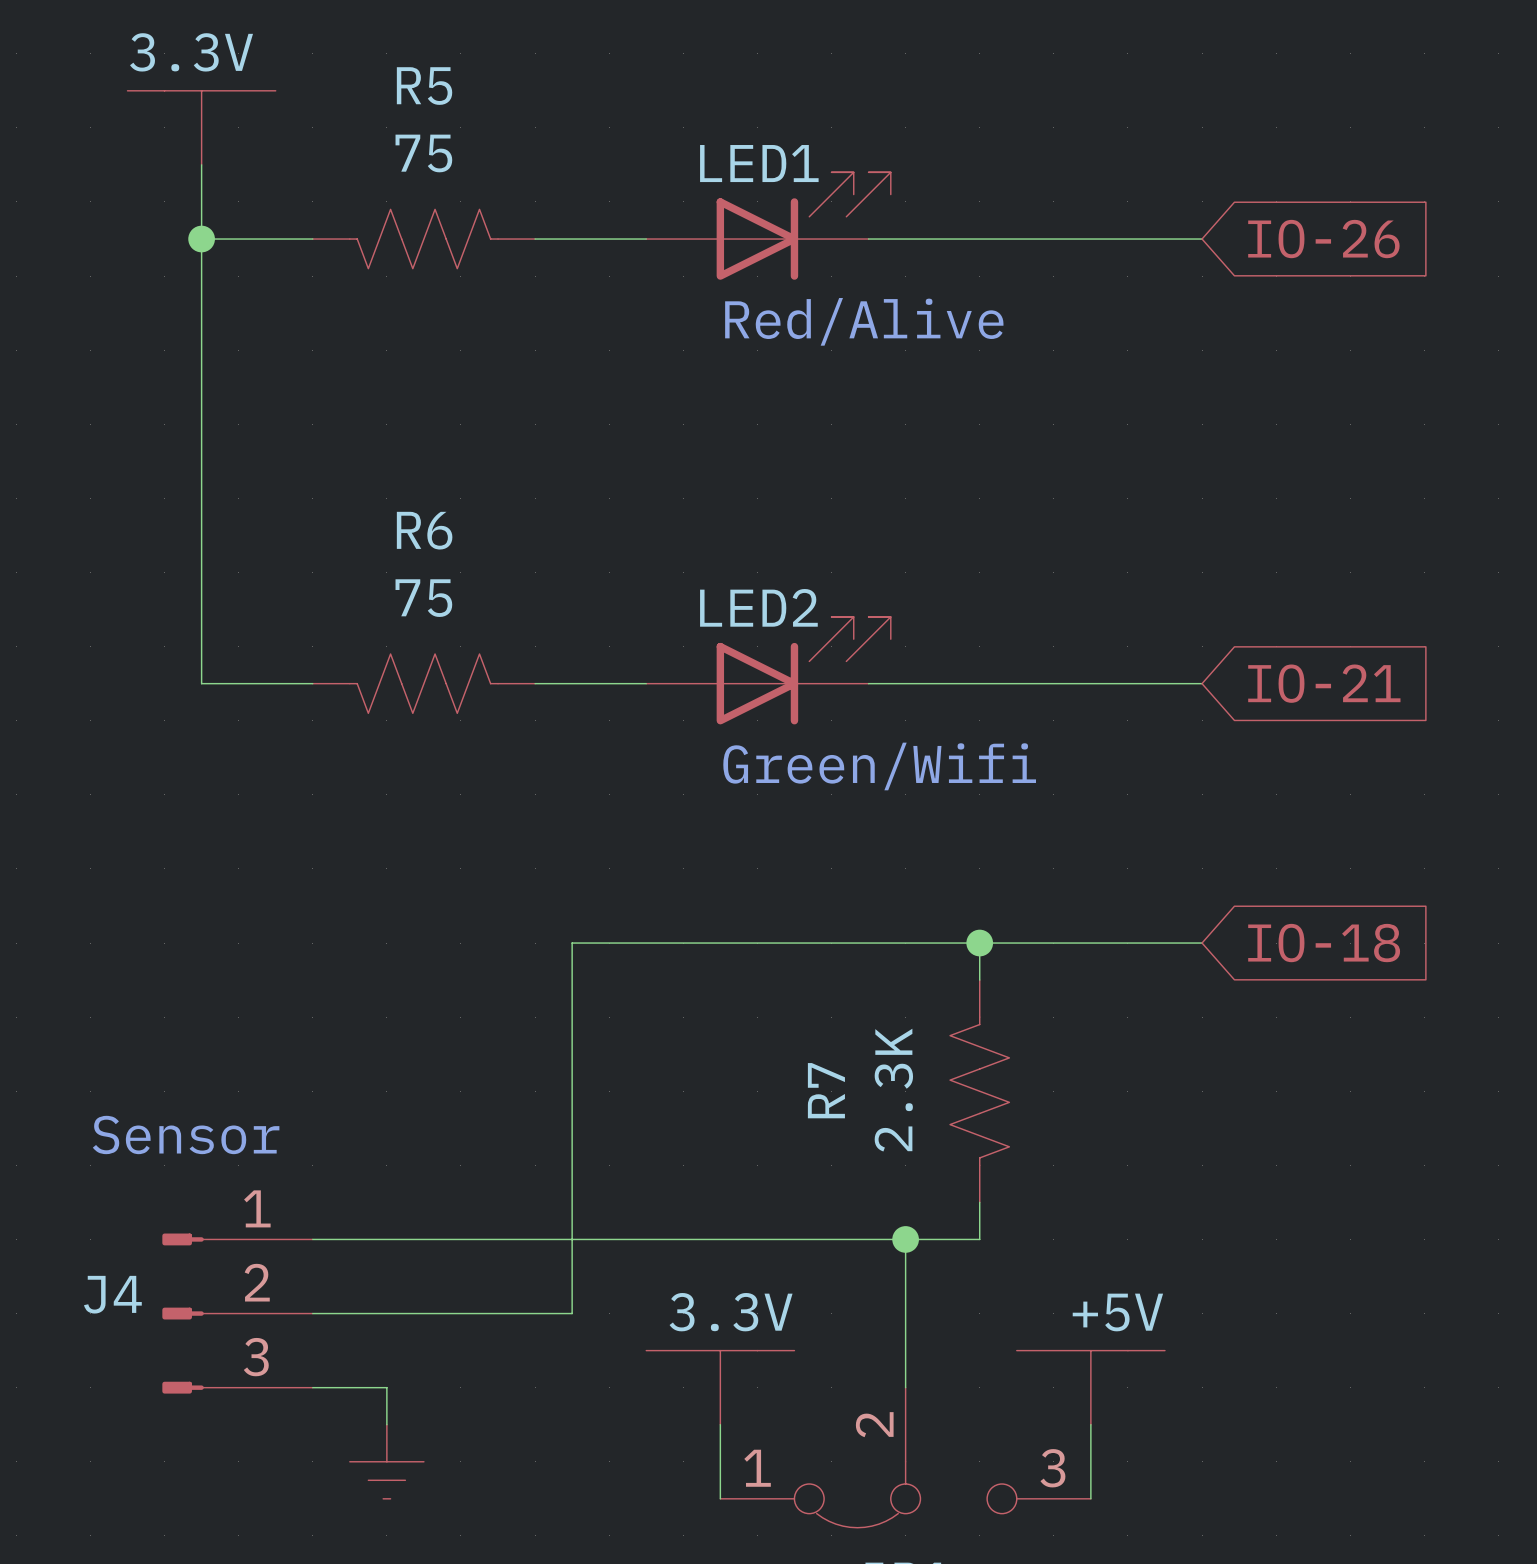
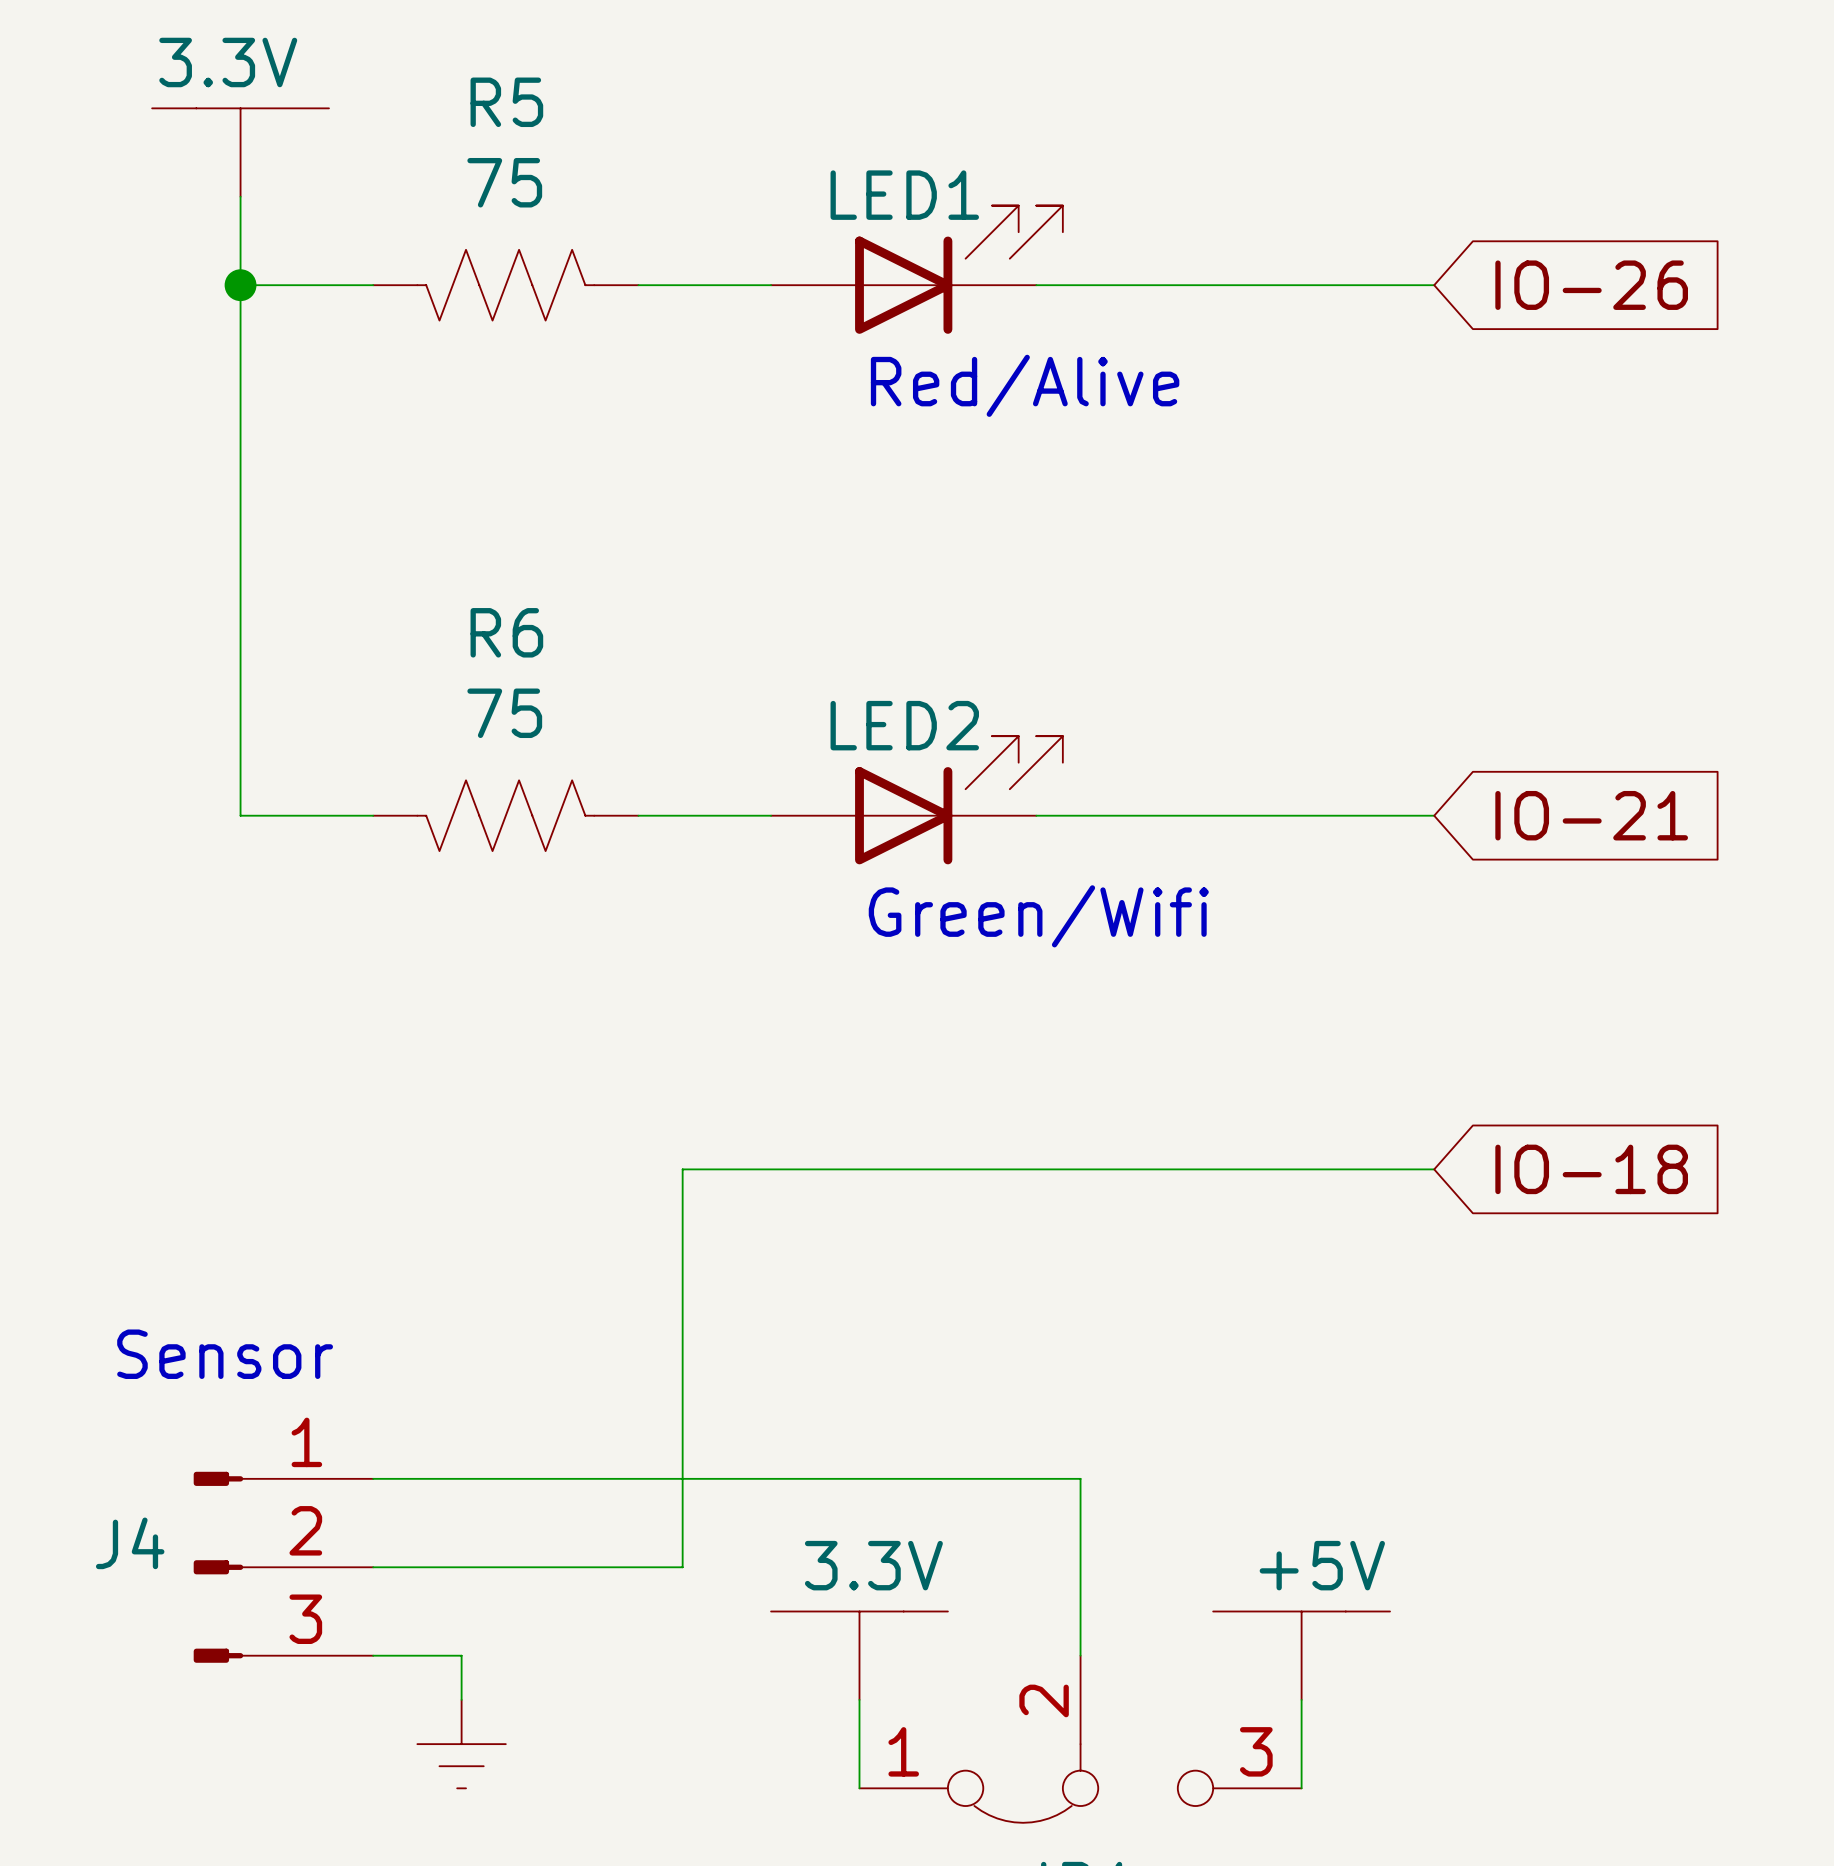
wire: (979, 943) (979, 980) -> none
junction: (979, 943) -> none
wire: (1202, 943) (572, 943) (572, 980) -> (1434, 1169) (682, 1169)
global label position: IO-18 (1324, 943) -> IO-18 (1591, 1169)
R7: 2.3K (979, 1091) -> none
wire: (979, 1202) (979, 1239) (905, 1239) -> none
junction: (905, 1239) -> none

